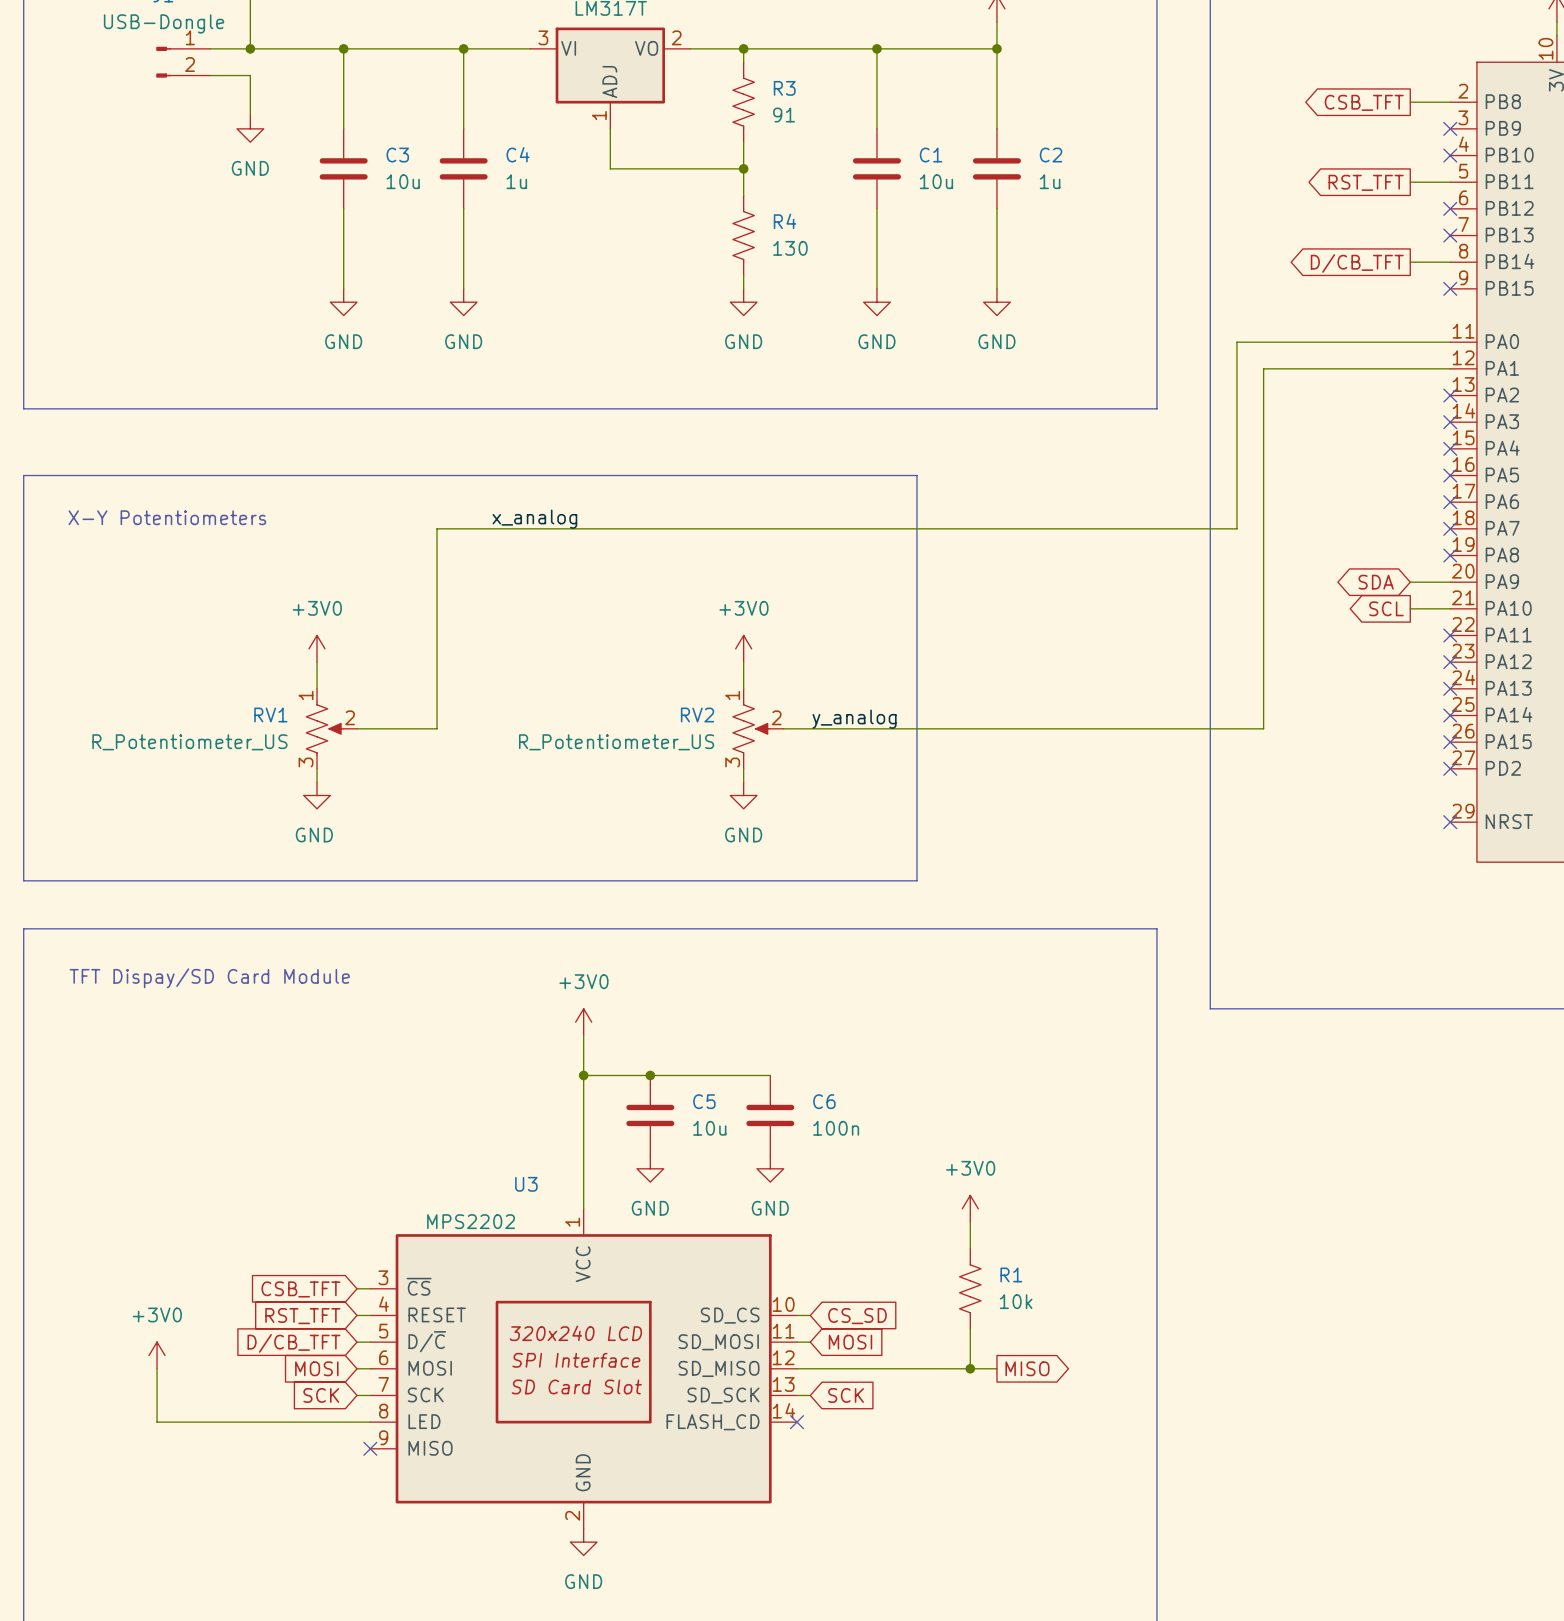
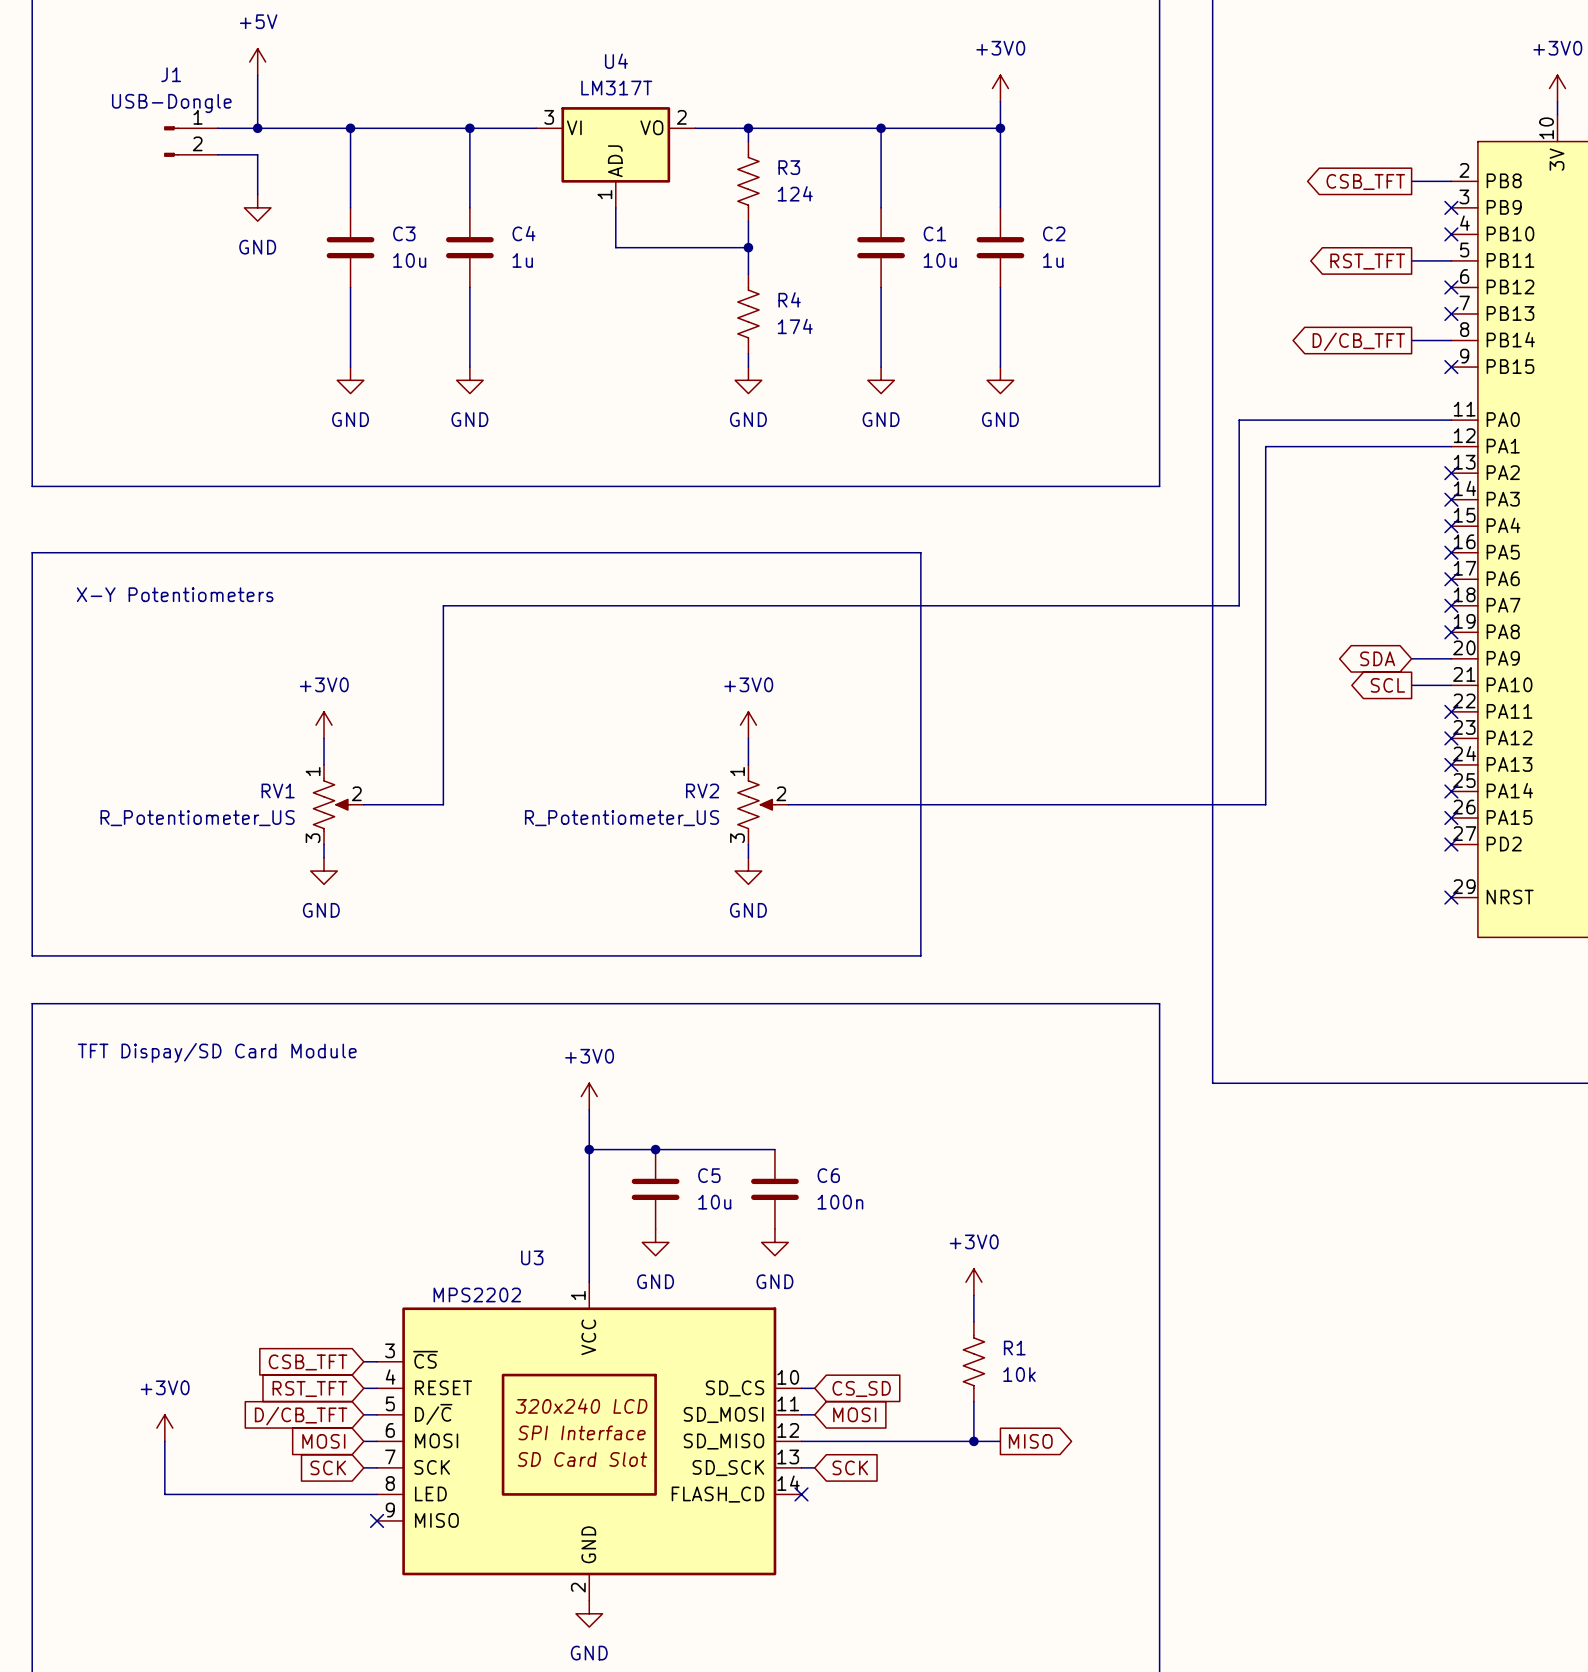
R3 value: 91 (784, 115) -> 124 (795, 193)
R4 value: 130 (790, 248) -> 174 (795, 326)
label: x_analog (534, 519) -> none
label: y_analog (854, 719) -> none

